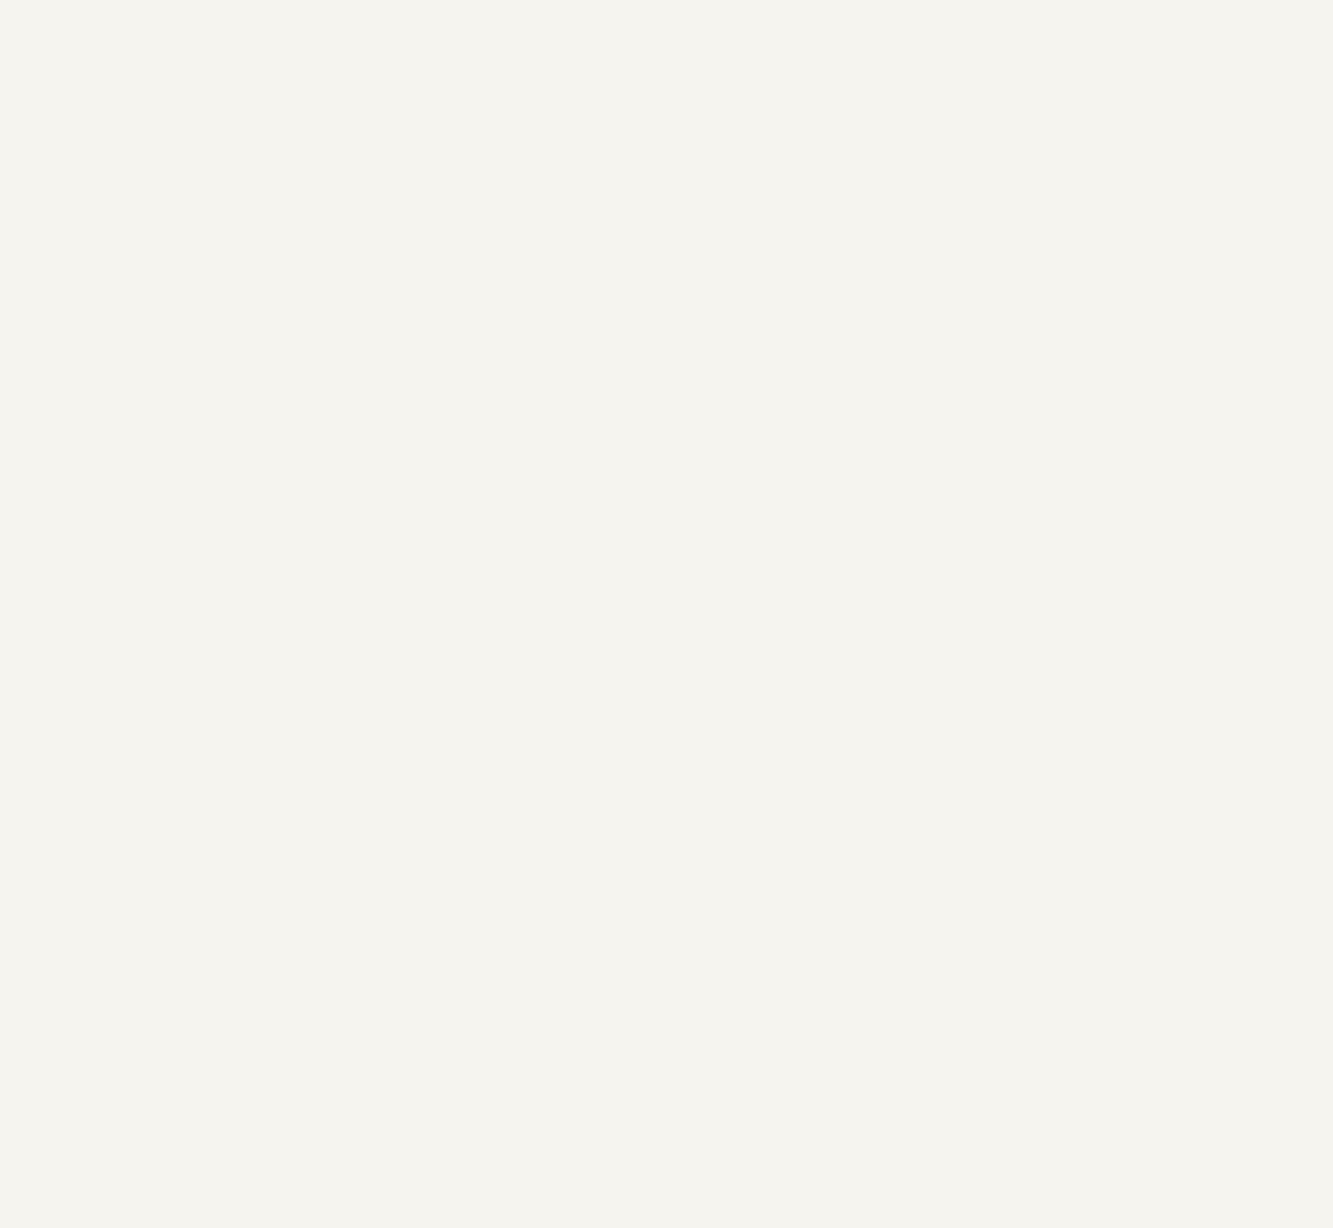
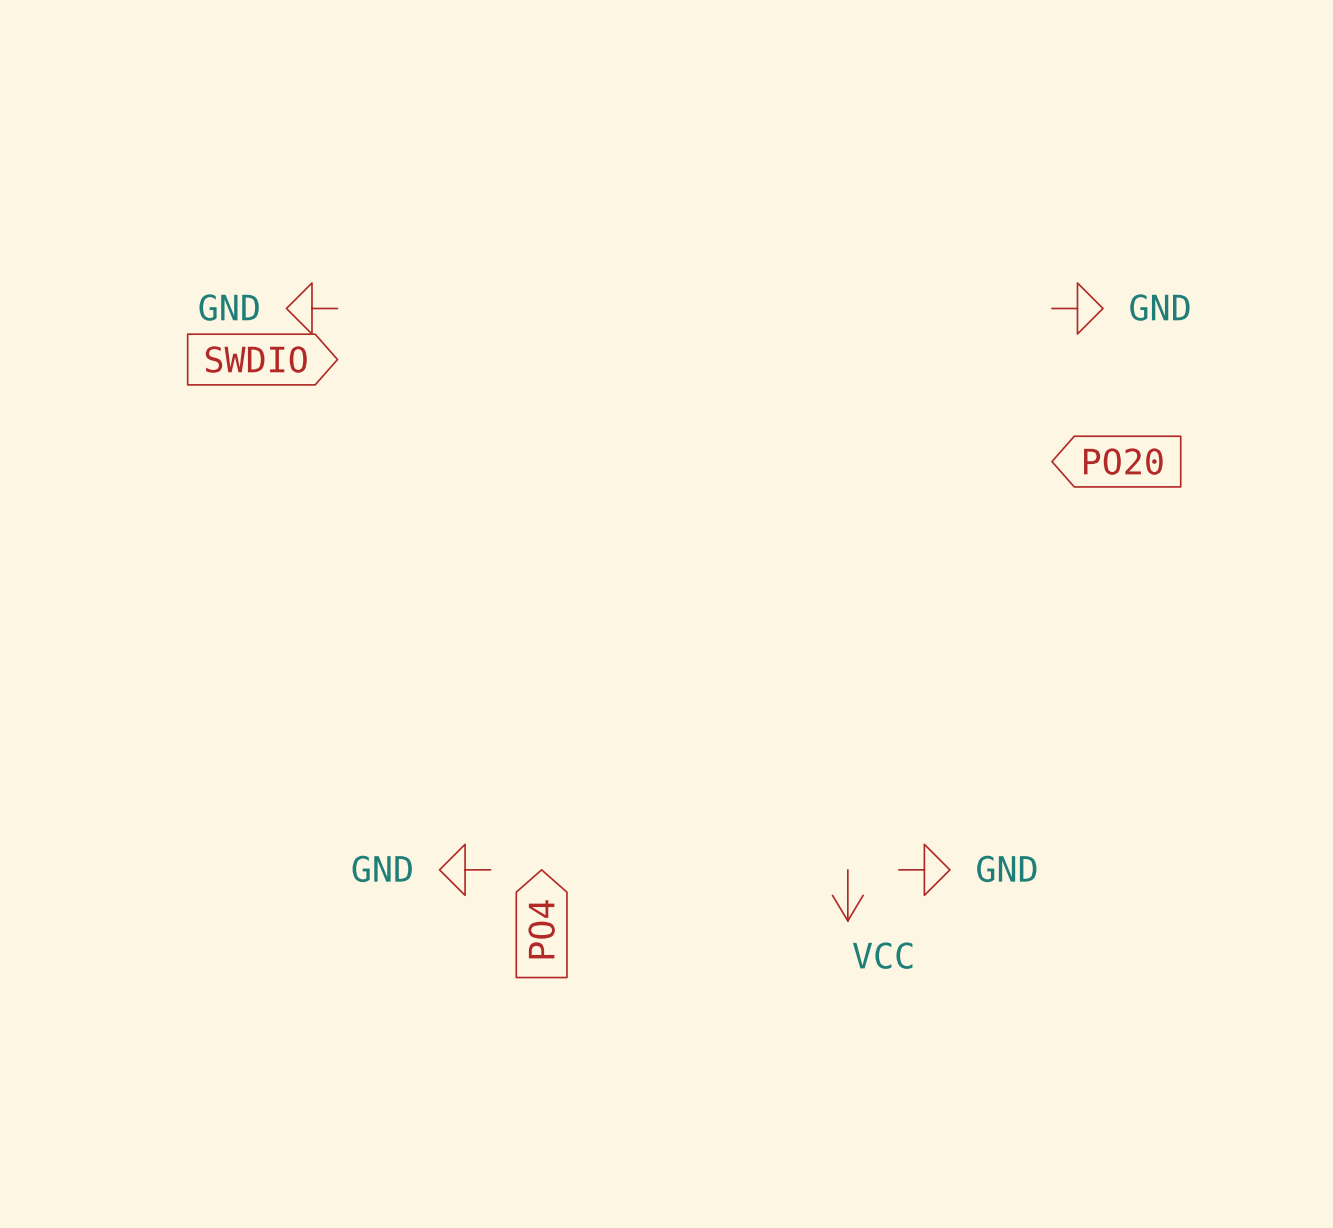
power symbol: none -> GND (311, 308)
power symbol: none -> GND (1077, 308)
global label: none -> SWDIO (256, 359)
global label: none -> PO20 (1123, 461)
power symbol: none -> GND (465, 869)
power symbol: none -> GND (924, 869)
power symbol: none -> VCC (847, 895)
global label: none -> PO4 (541, 929)

